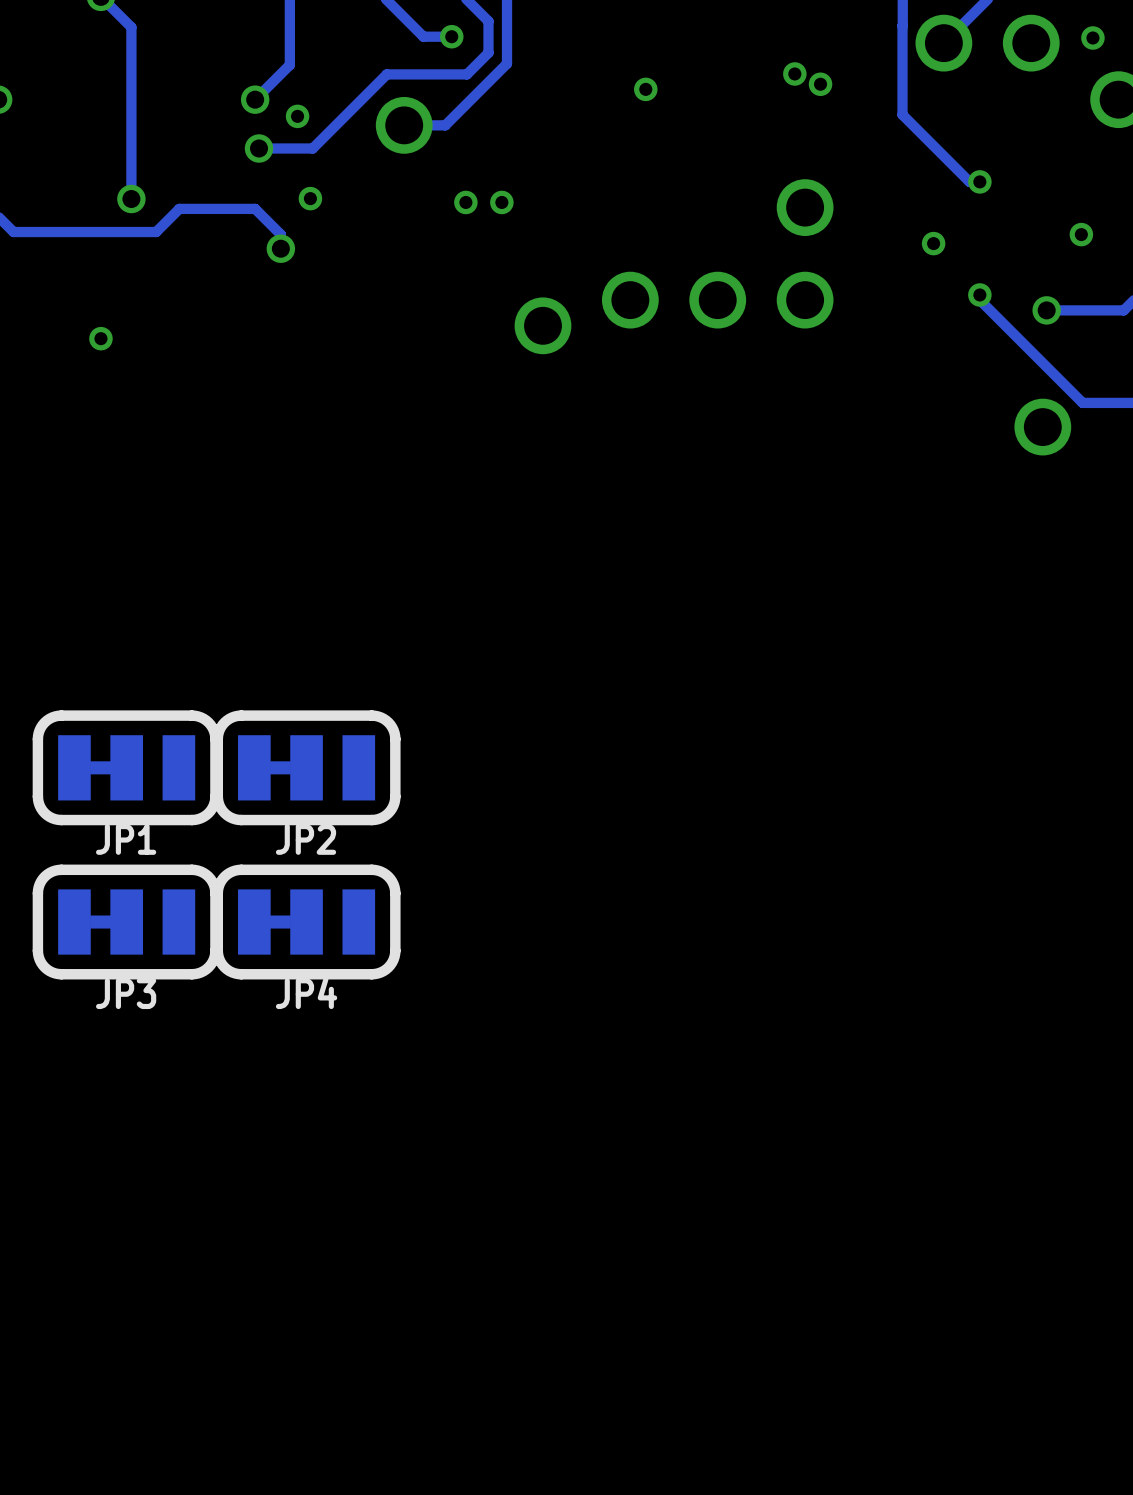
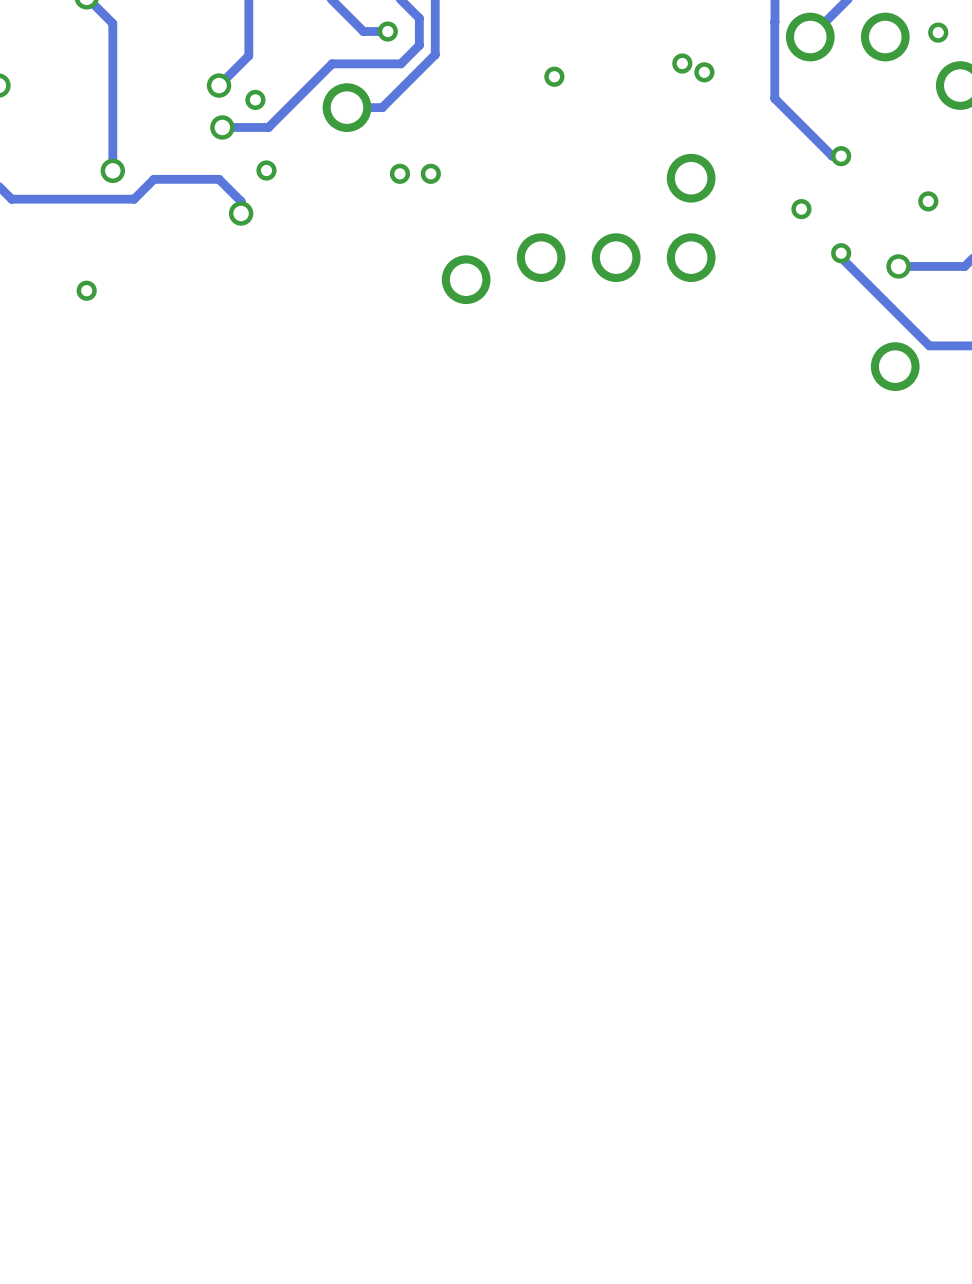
JP1: (126, 767) -> none
JP2: (306, 767) -> none
JP3: (126, 922) -> none
JP4: (306, 922) -> none

